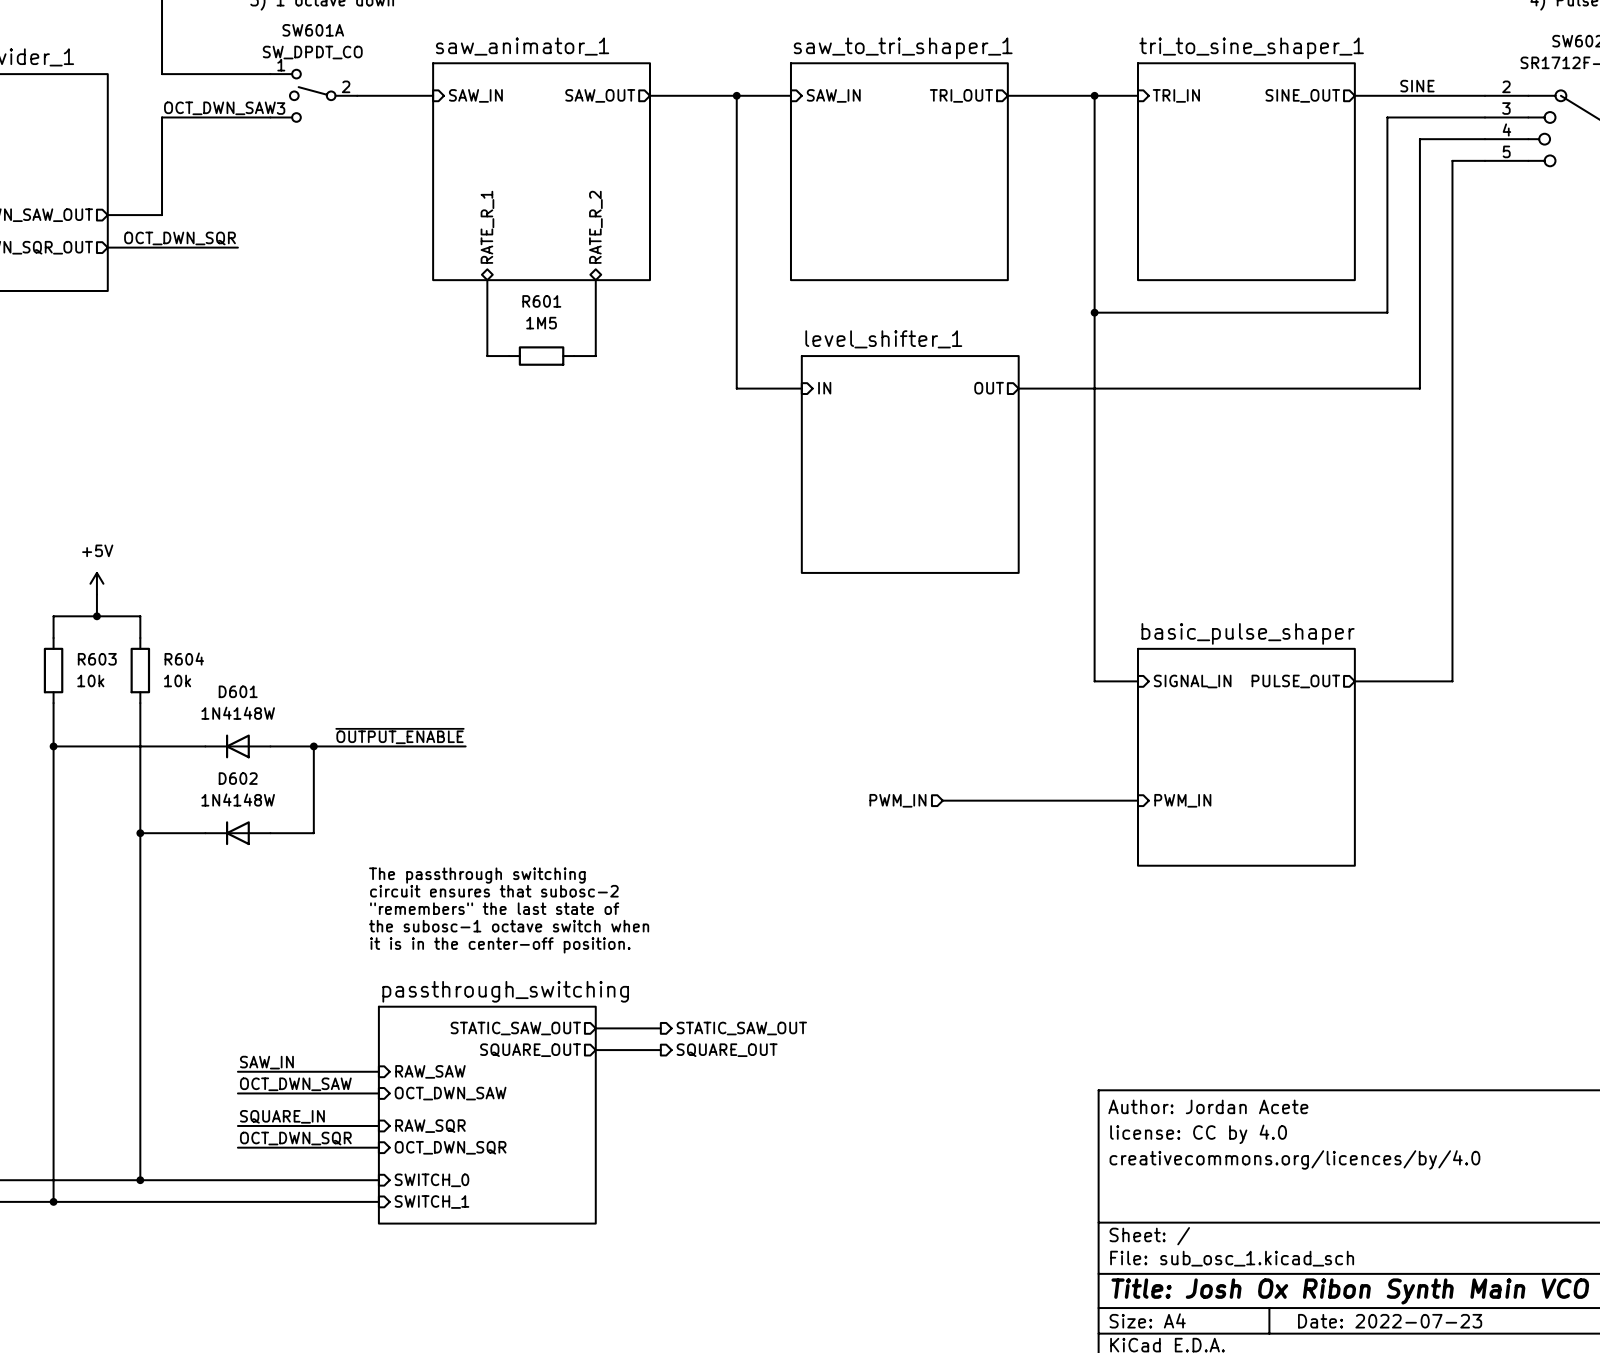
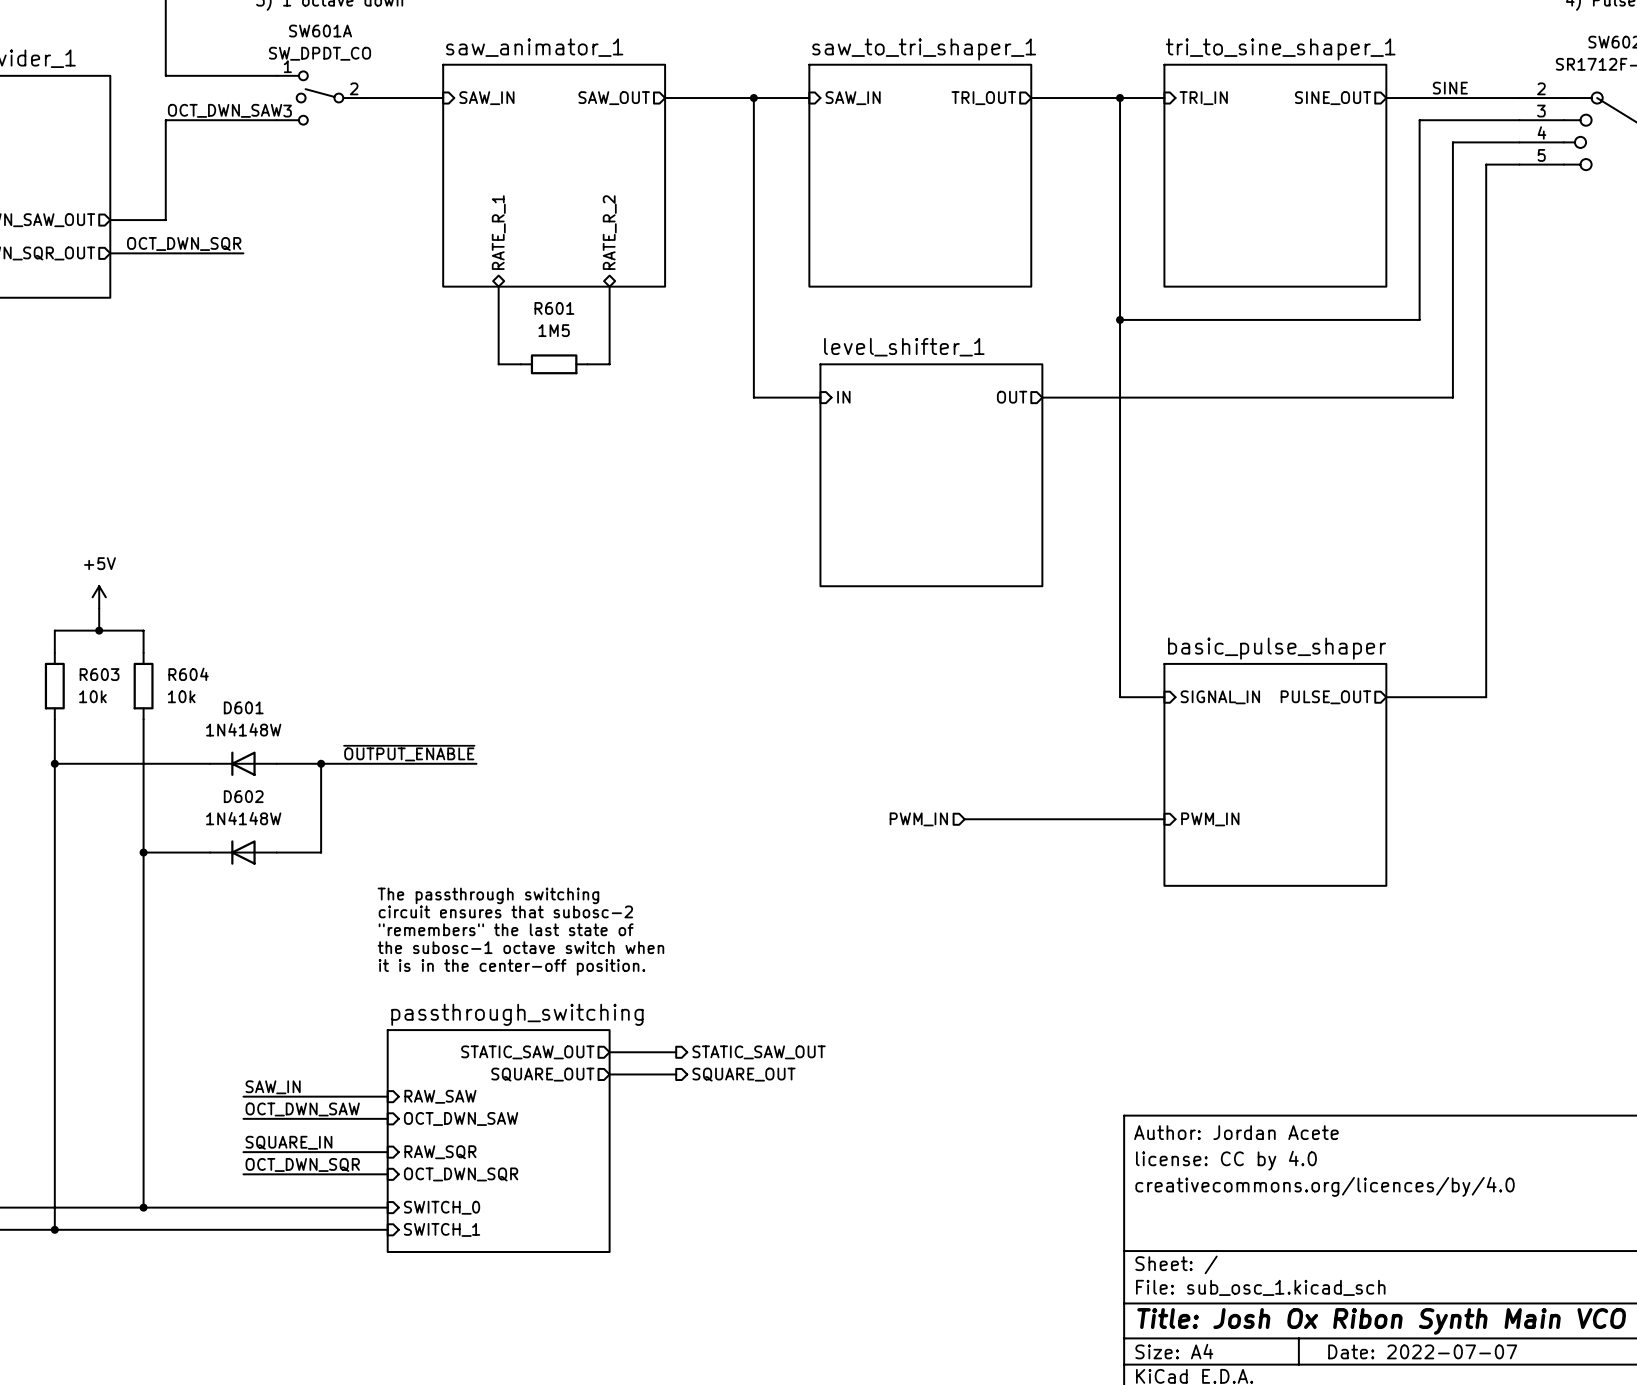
title block: Date: 2022-07-23 (1390, 1321) -> Date: 2022-07-07 (1422, 1351)

